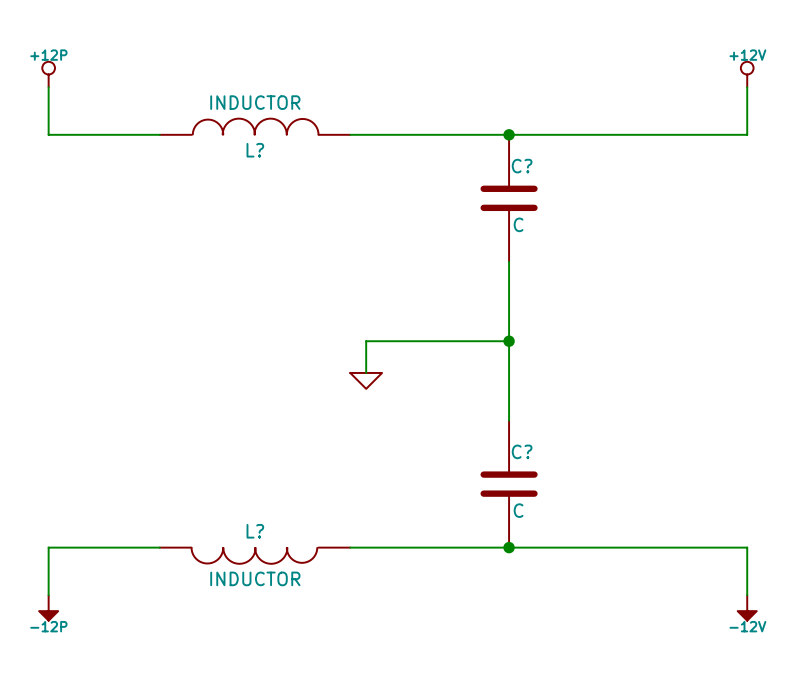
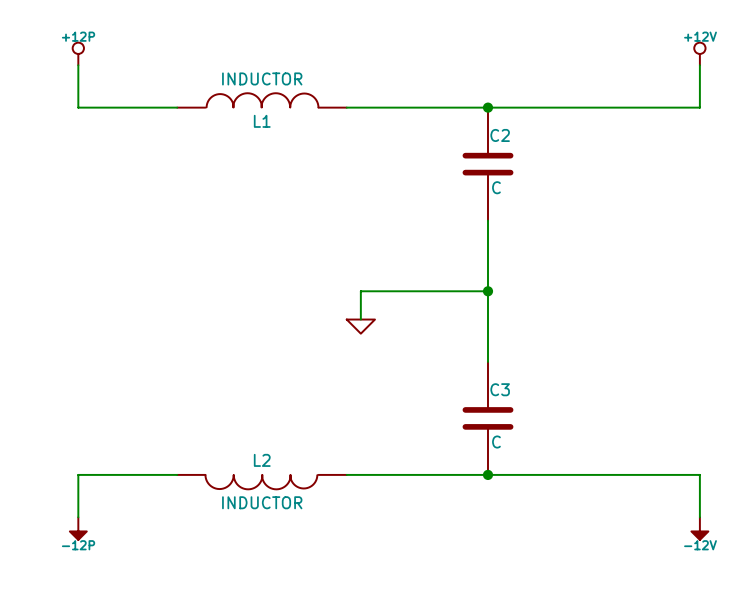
L? name: L? (255, 150) -> L1 (262, 121)
C? name: C? (522, 166) -> C2 (500, 135)
C? name: C? (522, 451) -> C3 (500, 389)
L? name: L? (255, 531) -> L2 (262, 460)

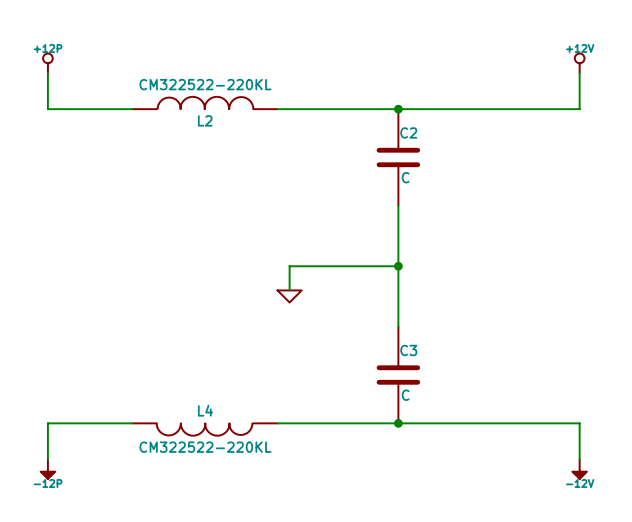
L1 value: INDUCTOR (262, 78) -> CM322522-220KL (205, 84)
L1 name: L1 (262, 121) -> L2 (205, 120)
L2 name: L2 (262, 460) -> L4 (205, 410)
L2 value: INDUCTOR (262, 502) -> CM322522-220KL (205, 447)

